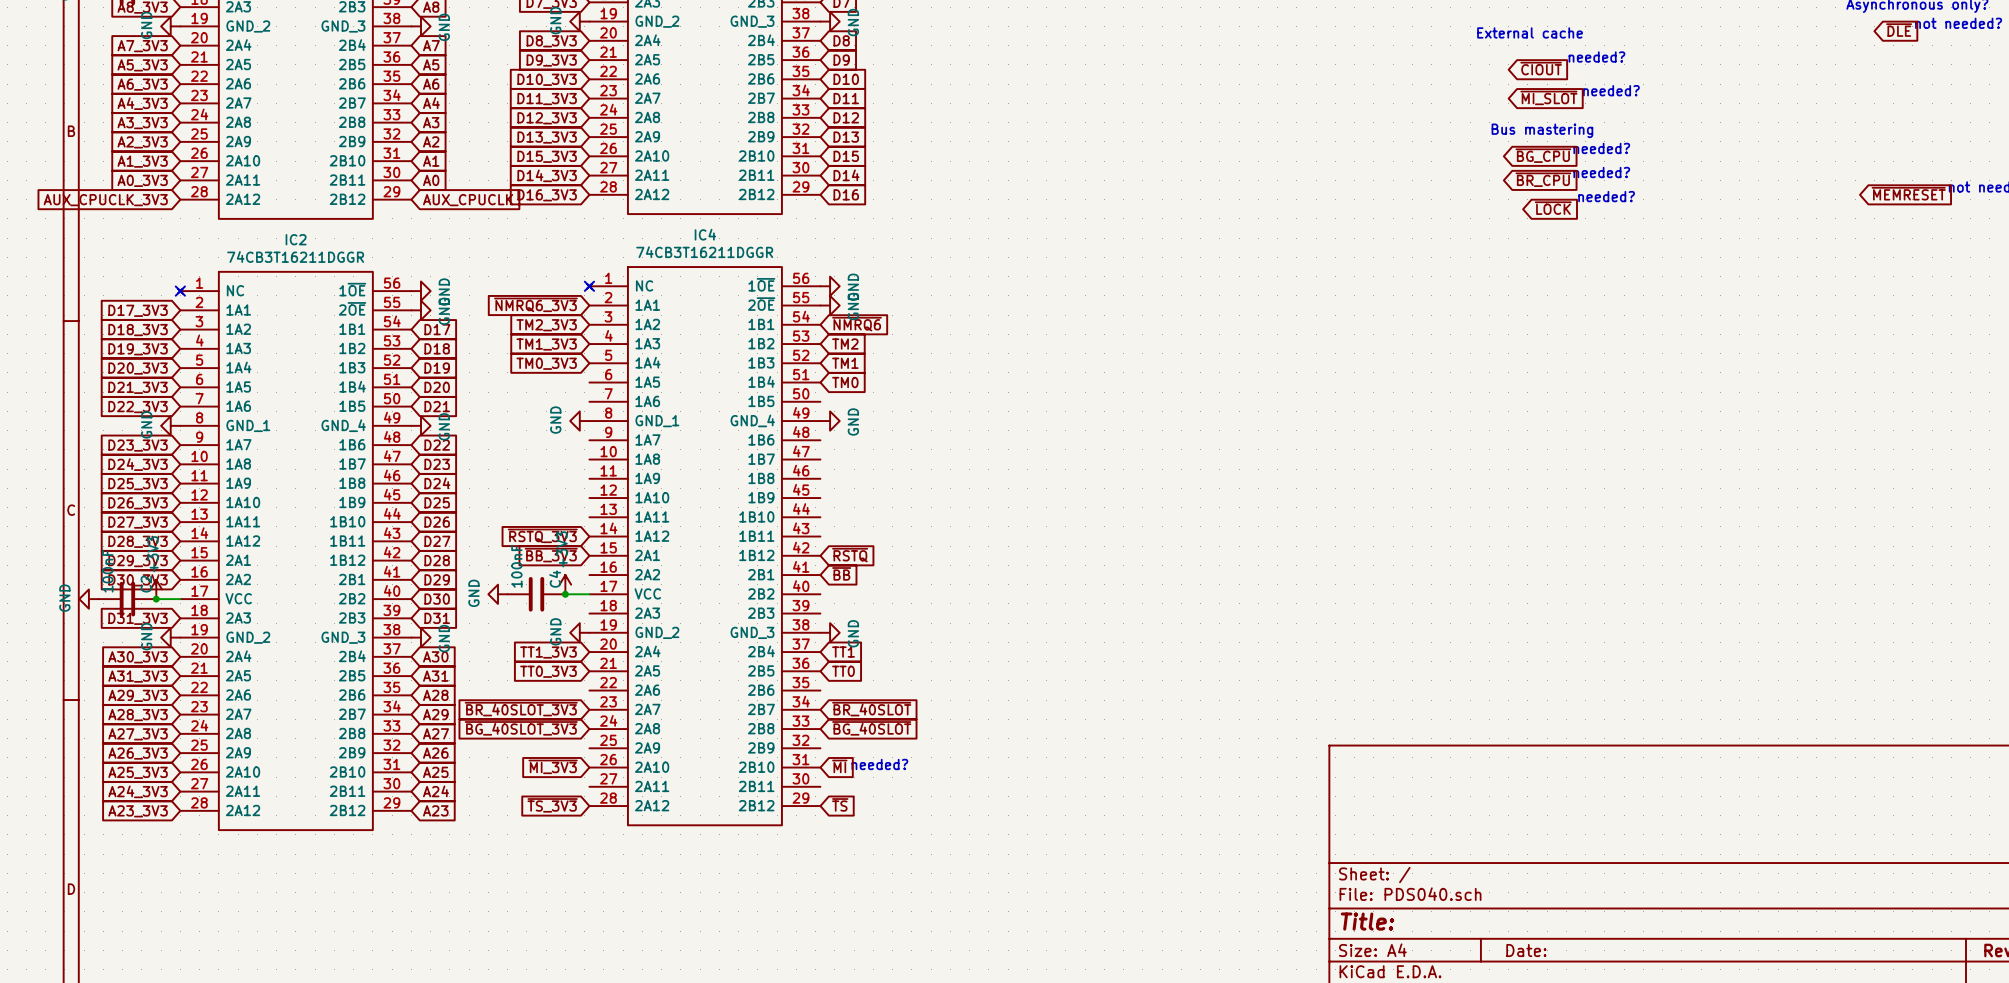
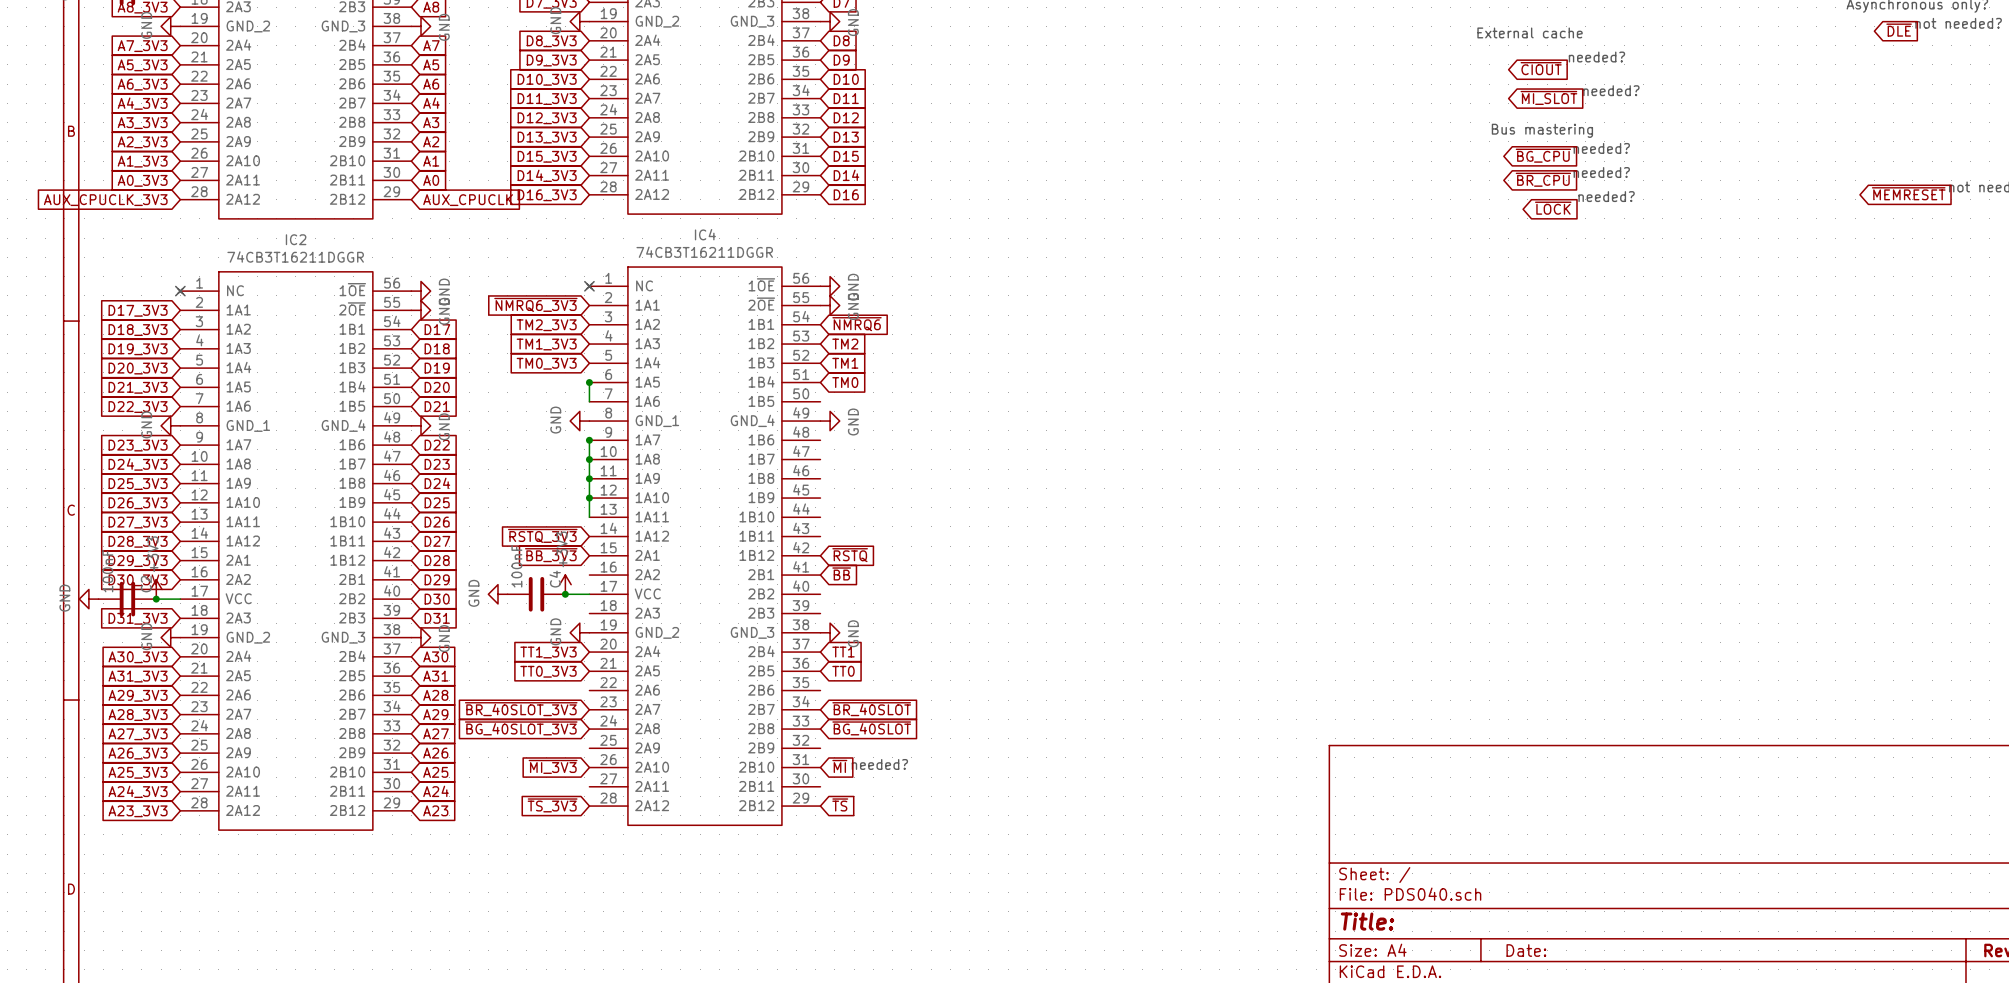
wire: none -> (589, 382) (589, 401)
junction: none -> (589, 382)
wire: none -> (589, 440) (589, 517)
junction: none -> (589, 440)
junction: none -> (589, 459)
junction: none -> (589, 478)
junction: none -> (589, 498)

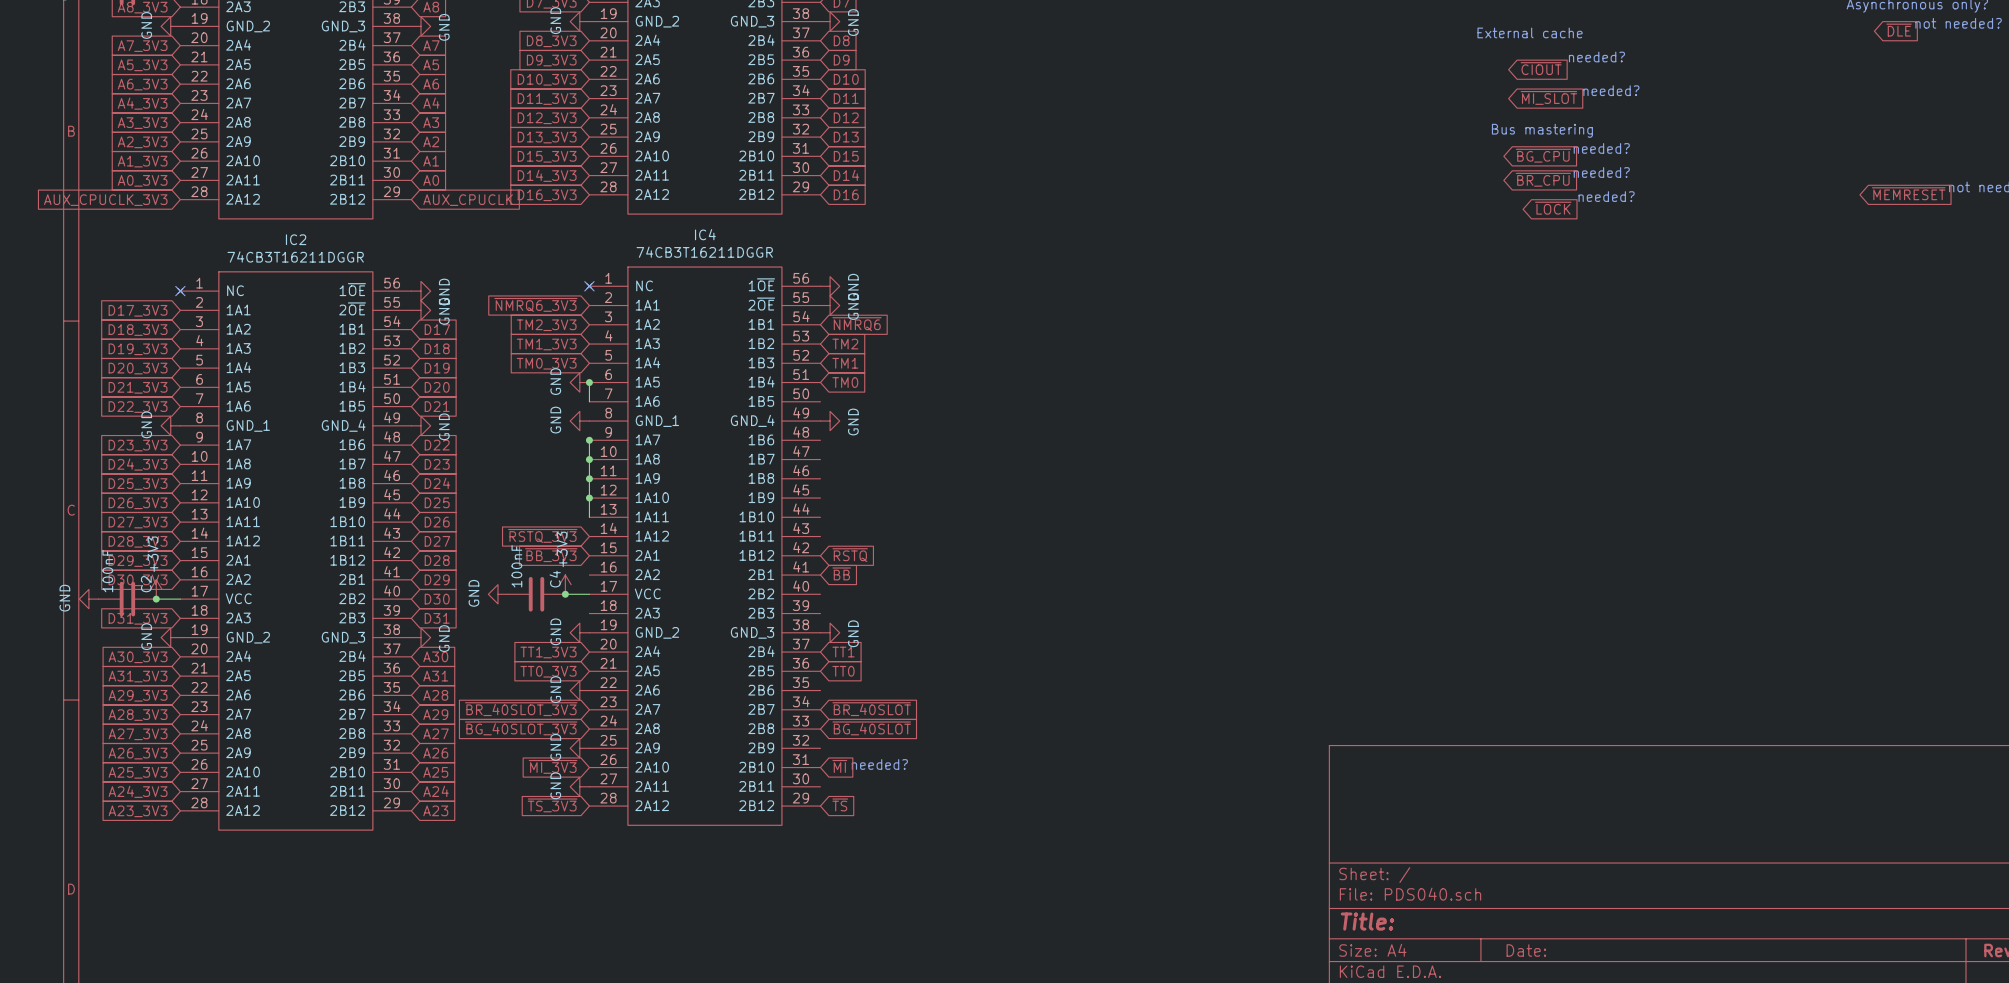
power symbol: none -> GND (579, 382)
power symbol: none -> GND (579, 690)
power symbol: none -> GND (579, 748)
power symbol: none -> GND (579, 786)

